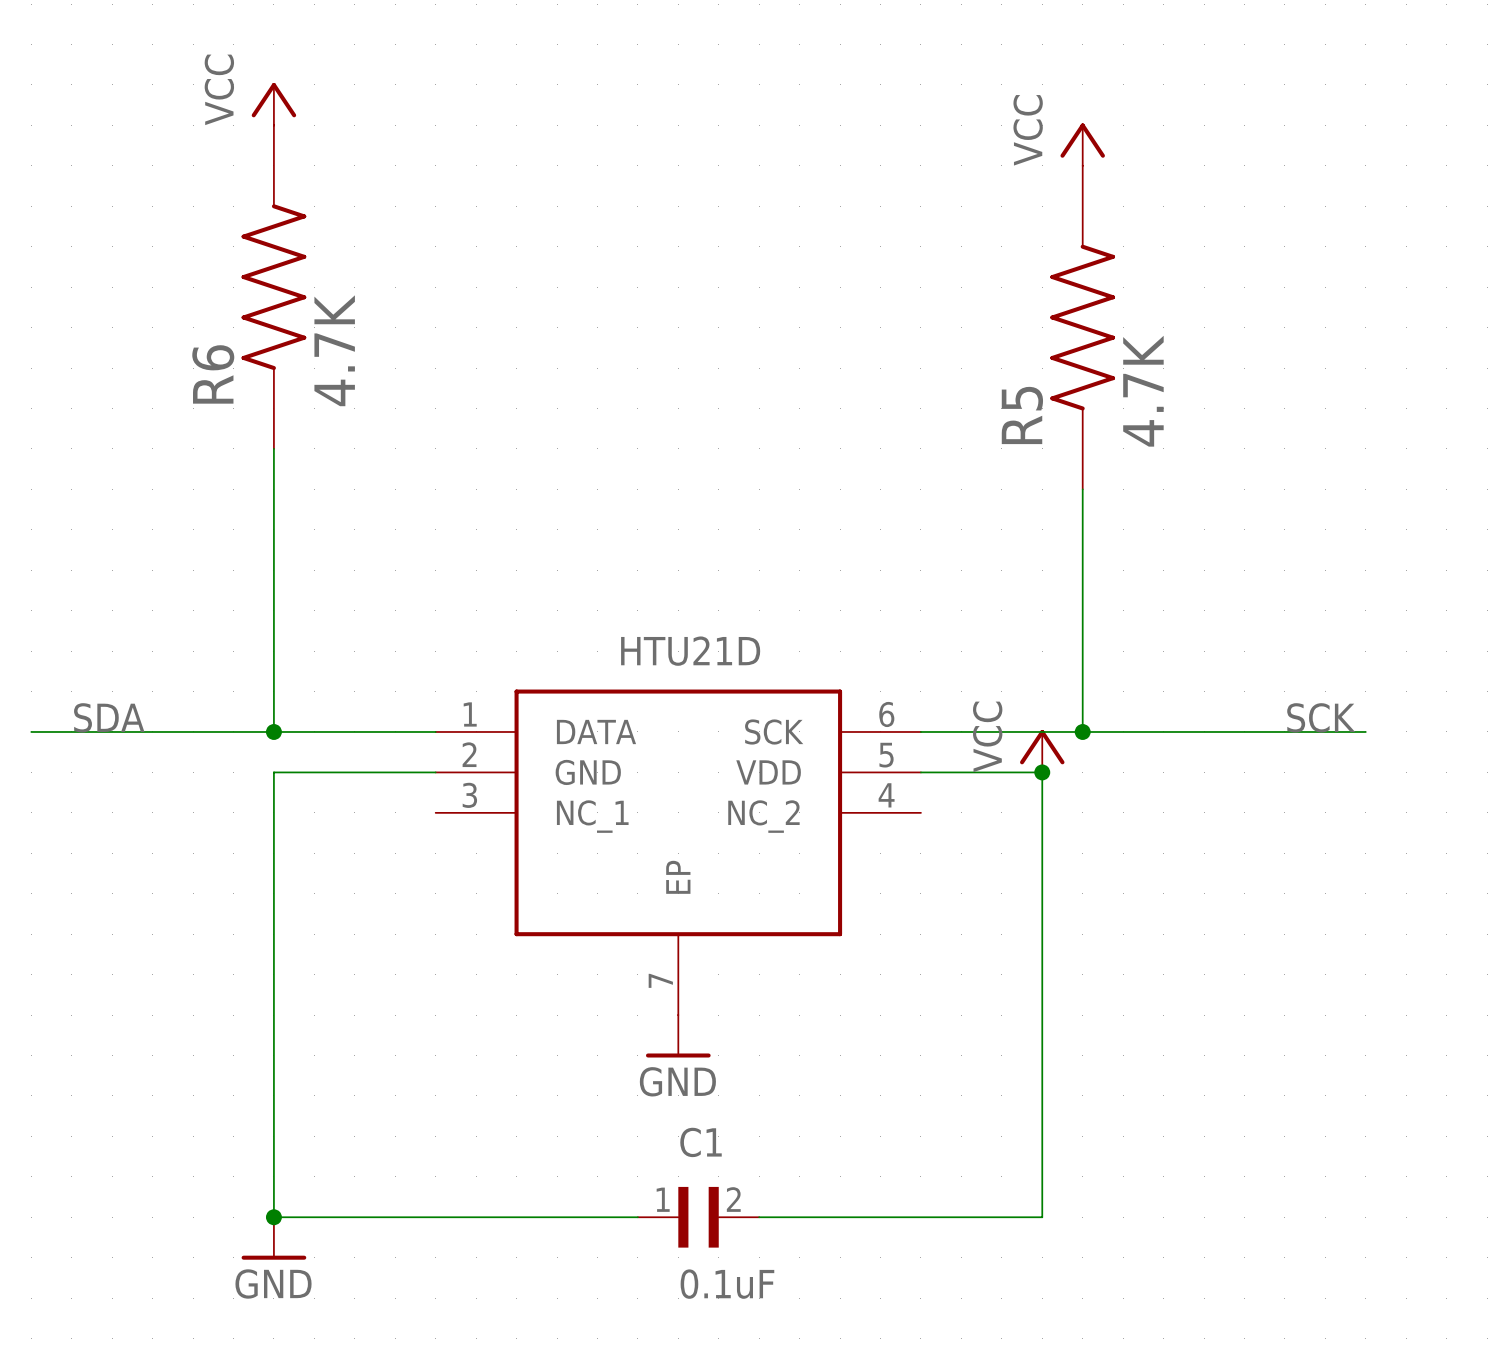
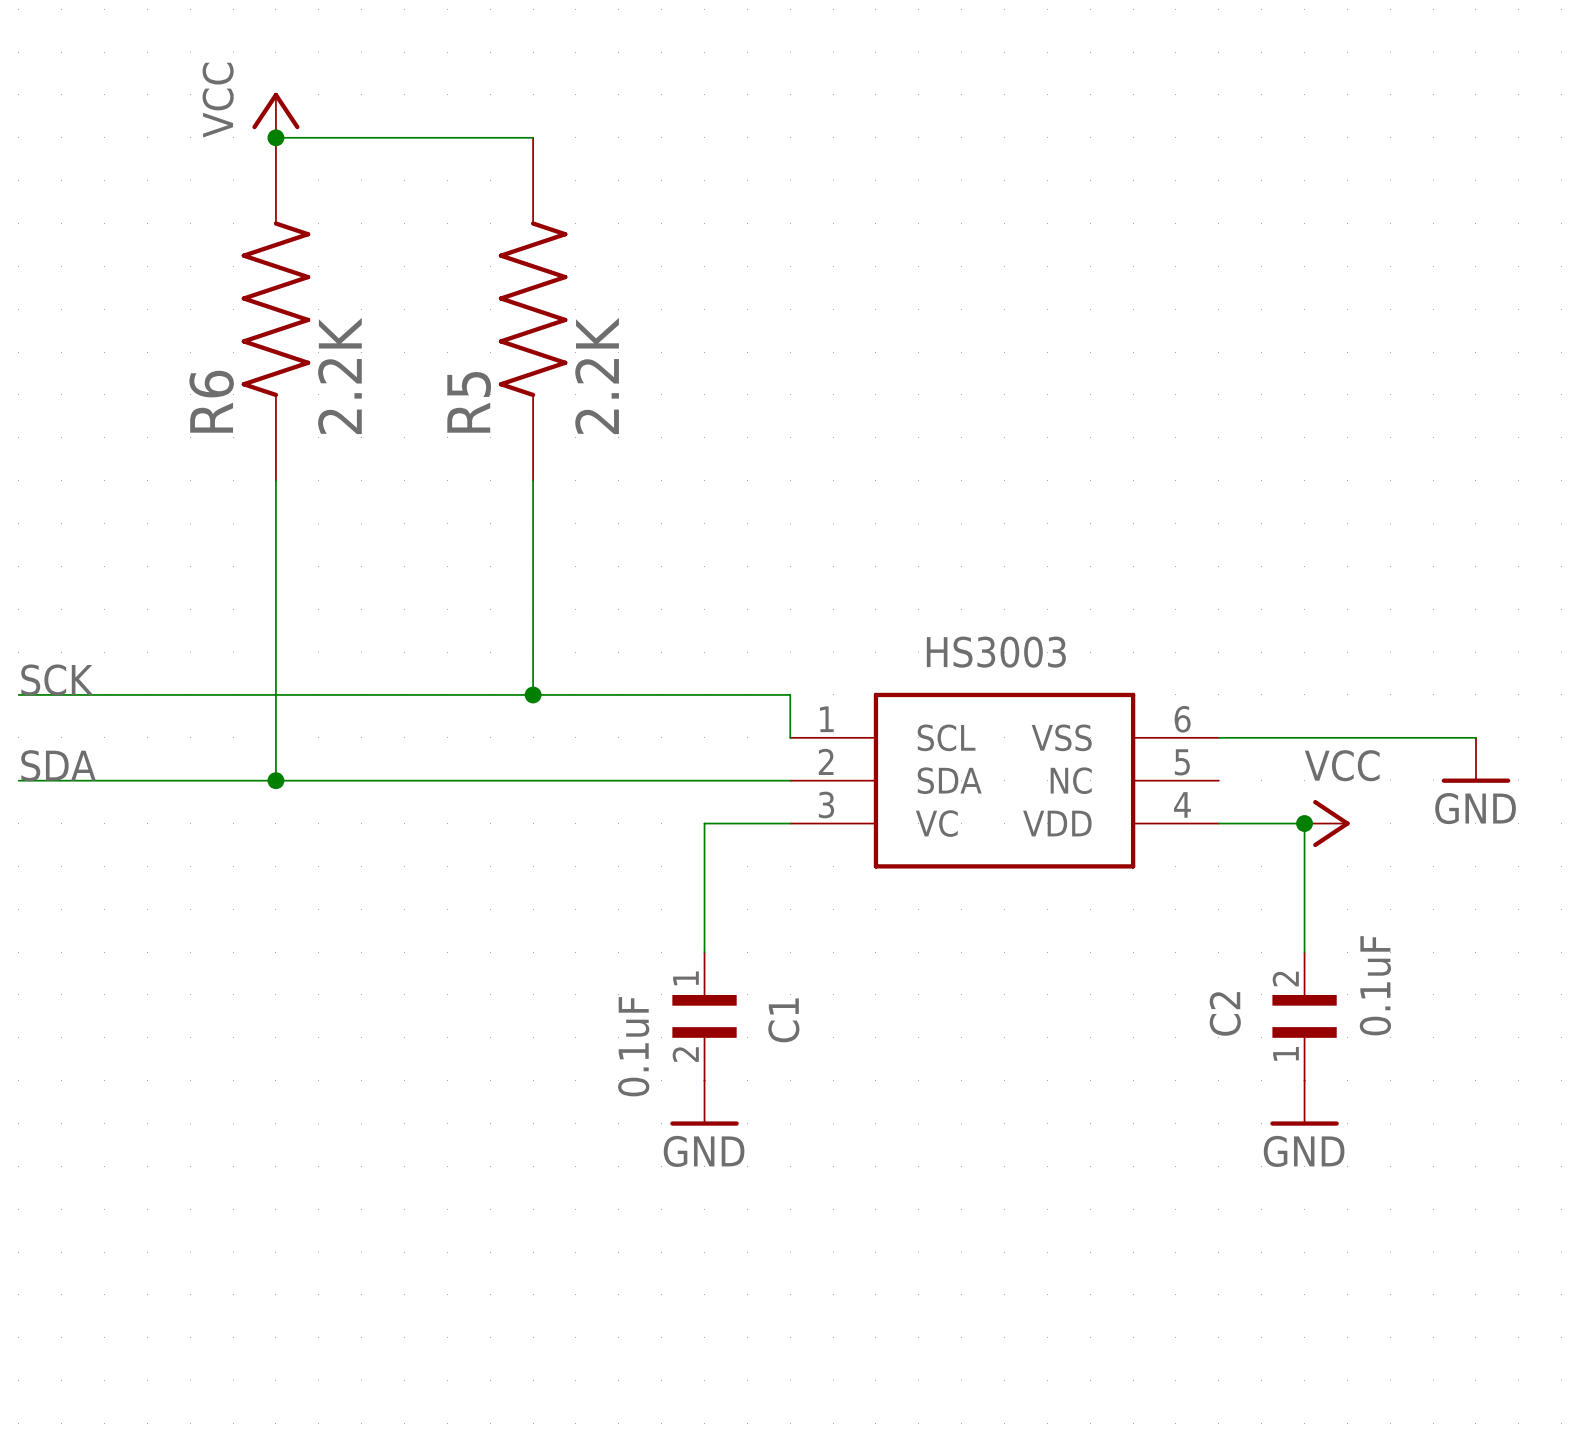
wire: none -> (275, 137) (533, 137)
junction: none -> (275, 137)
power symbol: VCC (1082, 144) -> none
R5 position: (1082, 327) -> (533, 309)
R6 value: 4.7K (334, 350) -> 2.2K (339, 375)
R5 value: 4.7K (1143, 391) -> 2.2K (597, 375)
wire: none -> (533, 480) (533, 694)
wire: (1082, 489) (1082, 731) -> none
label: none -> SCK (57, 679)
wire: none -> (18, 694) (790, 694) (790, 737)
junction: none -> (533, 694)
wire: none -> (1218, 737) (1475, 737)
power symbol: none -> GND (1475, 760)
label position: SDA (109, 717) -> SDA (58, 765)
label: SCK (1321, 717) -> none
wire: none -> (447, 780) (790, 780)
wire: (920, 731) (1365, 731) -> none
part: none -> HS3003 (1004, 780)
junction: (1082, 731) -> none
power symbol rotation: 0° (1042, 747) -> 90° clockwise (1331, 823)
power symbol position: VCC (1042, 751) -> VCC (1327, 823)
wire: (435, 772) (273, 772) (273, 1217) (637, 1217) -> none
wire: none -> (790, 823) (704, 823) (704, 952)
wire: (920, 772) (1042, 772) (1042, 1217) (759, 1217) -> none
junction: (1042, 772) -> none
wire: none -> (1218, 823) (1304, 823) (1304, 952)
junction: none -> (1304, 823)
part: HTU21D (678, 852) -> none
C2: none -> 0.1uF (1304, 1016)
power symbol: none -> GND (1304, 1103)
junction: (273, 1217) -> none
C1 rotation: 0° (698, 1217) -> 90° clockwise (704, 1016)
C1 position: (698, 1217) -> (704, 1016)
power symbol: GND (273, 1238) -> none

